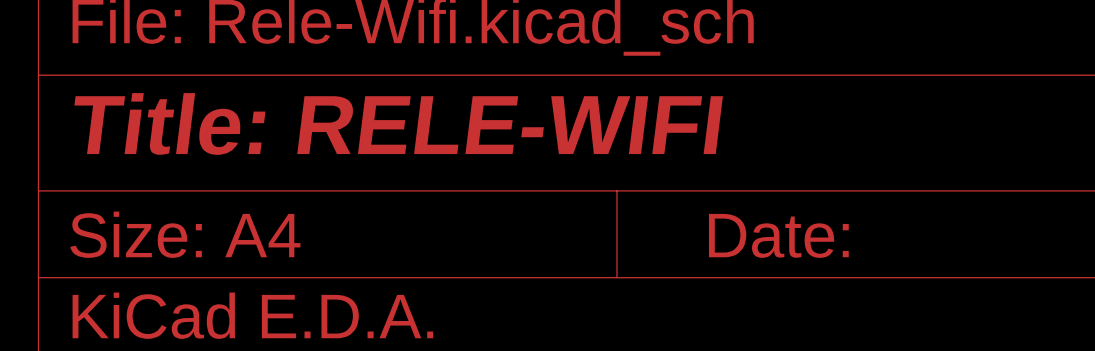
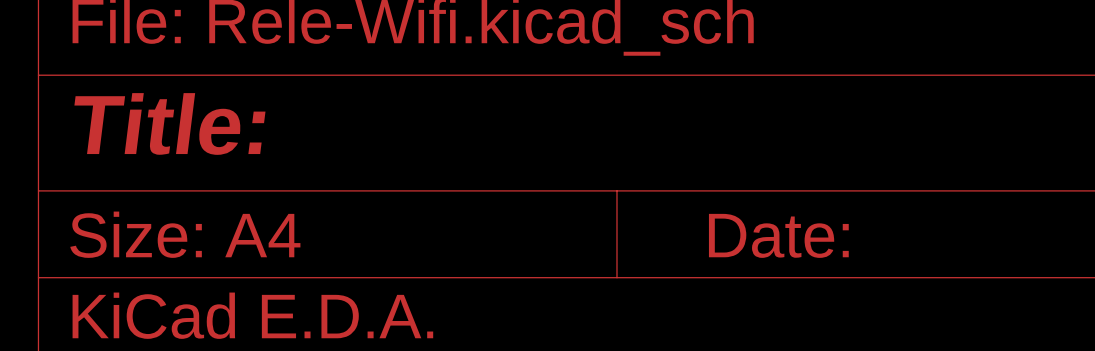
title block: Title: RELE-WIFI (398, 123) -> Title: (169, 123)

